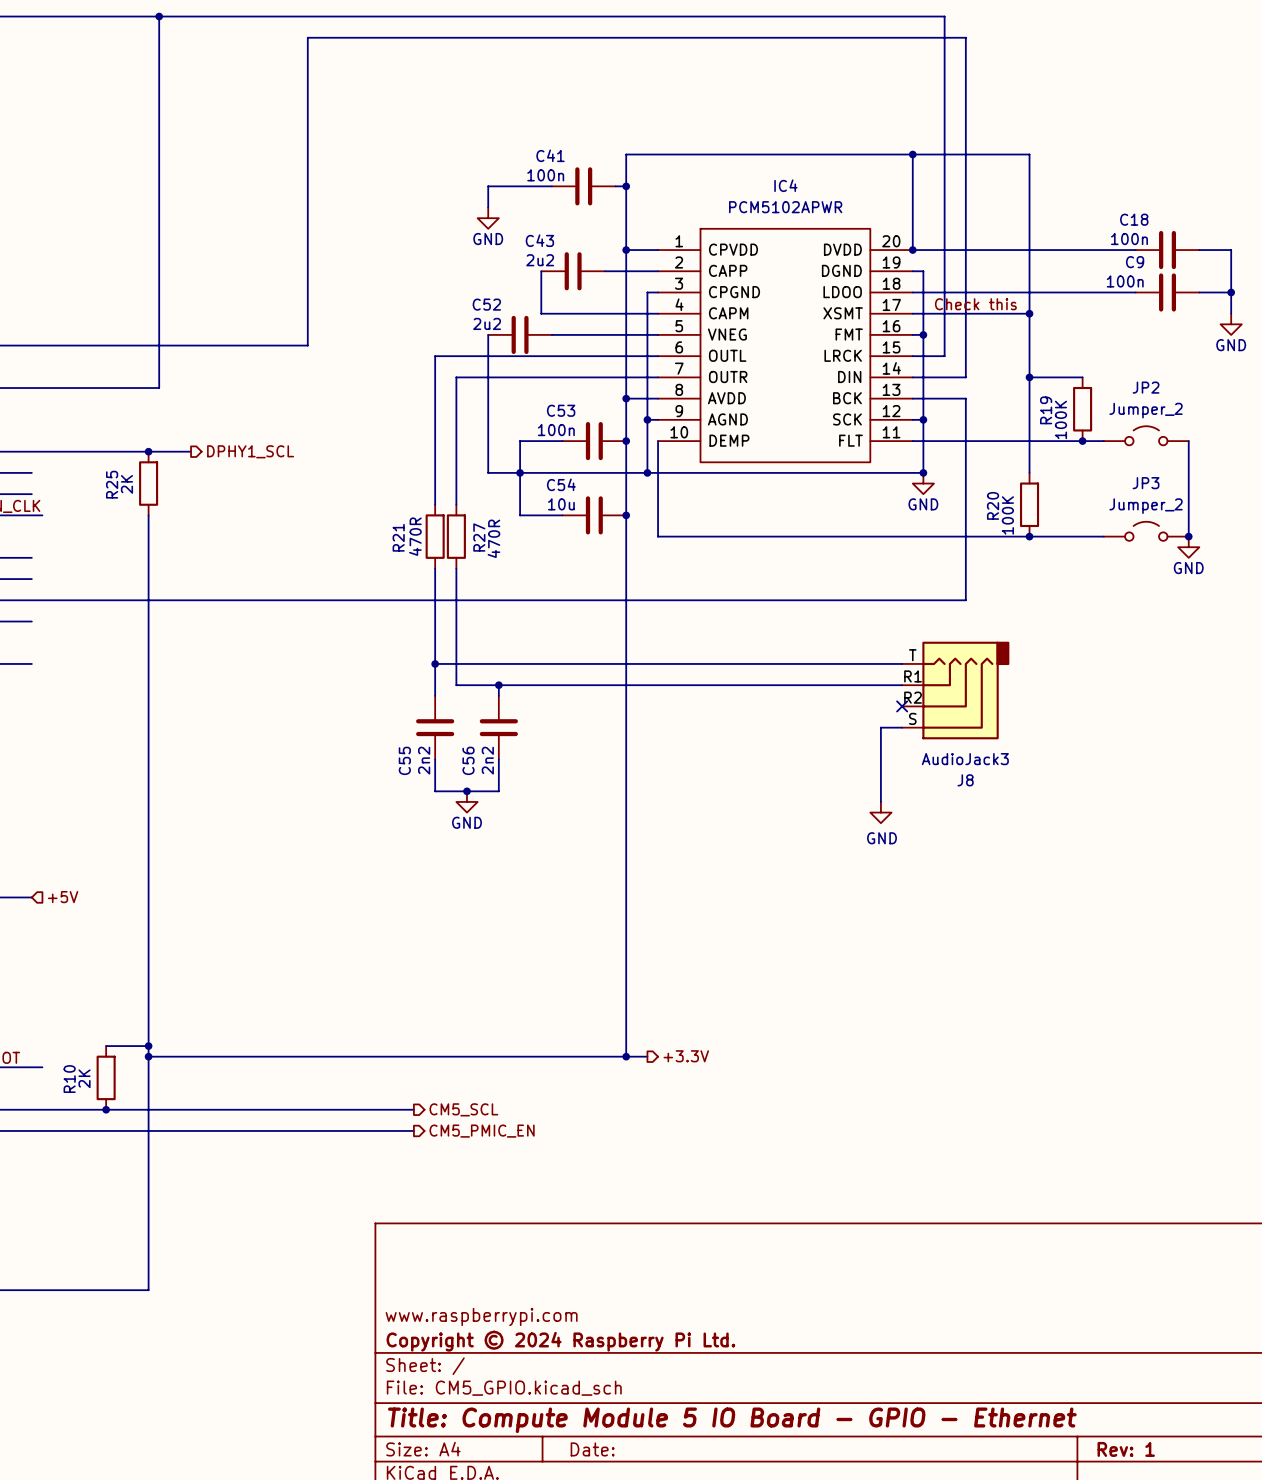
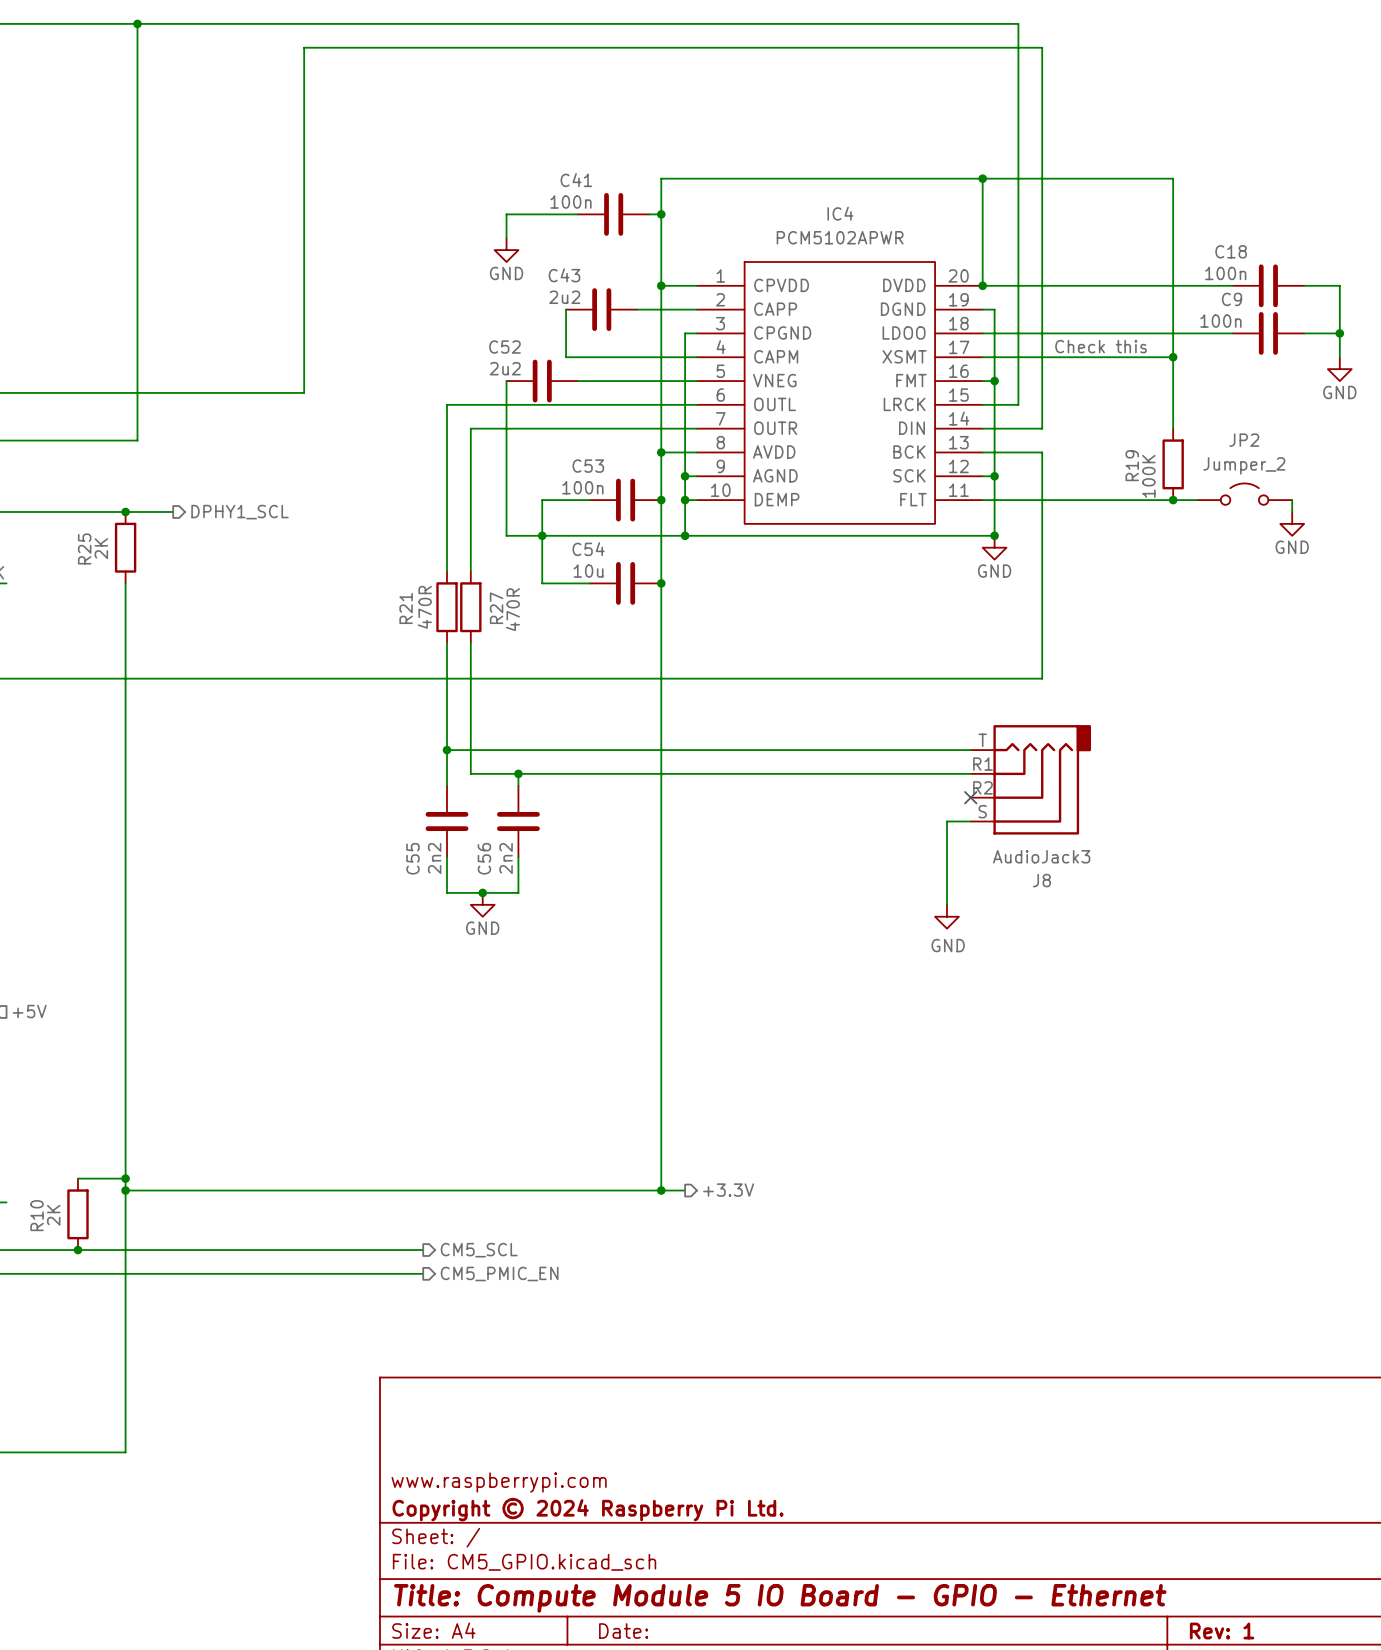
wire: (1029, 154) (1029, 472) -> (1113, 178) (1173, 178) (1173, 428)
label position: Check this (975, 304) -> Check this (1101, 346)
junction: (1029, 313) -> none
junction: none -> (1173, 357)
wire: (1029, 377) (1082, 377) -> (1113, 357) (1173, 357)
junction: (1029, 377) -> none
junction: none -> (685, 500)
wire: (658, 441) (658, 536) (1103, 536) -> (696, 500) (685, 500)
wire: (1188, 451) (1188, 536) -> none
R20: 100K (1029, 504) -> none
JP3: Jumper_2 (1146, 531) -> none
junction: (1029, 536) -> none
junction: (1188, 536) -> none
power symbol position: GND (1188, 547) -> GND (1292, 523)

